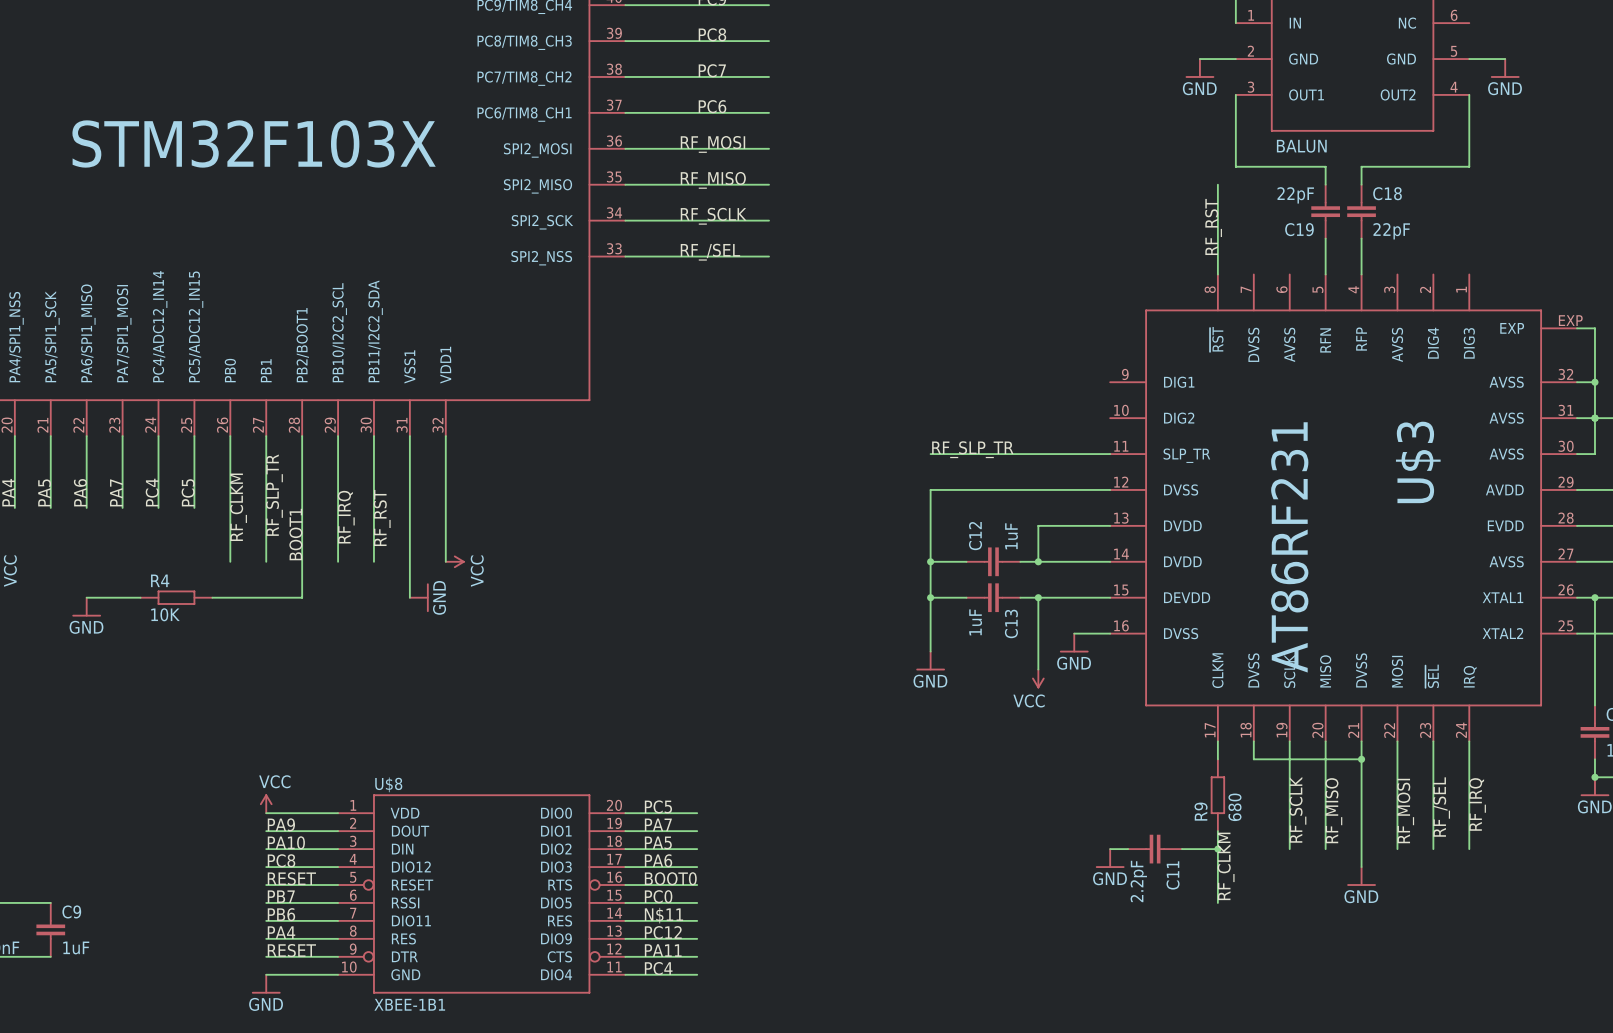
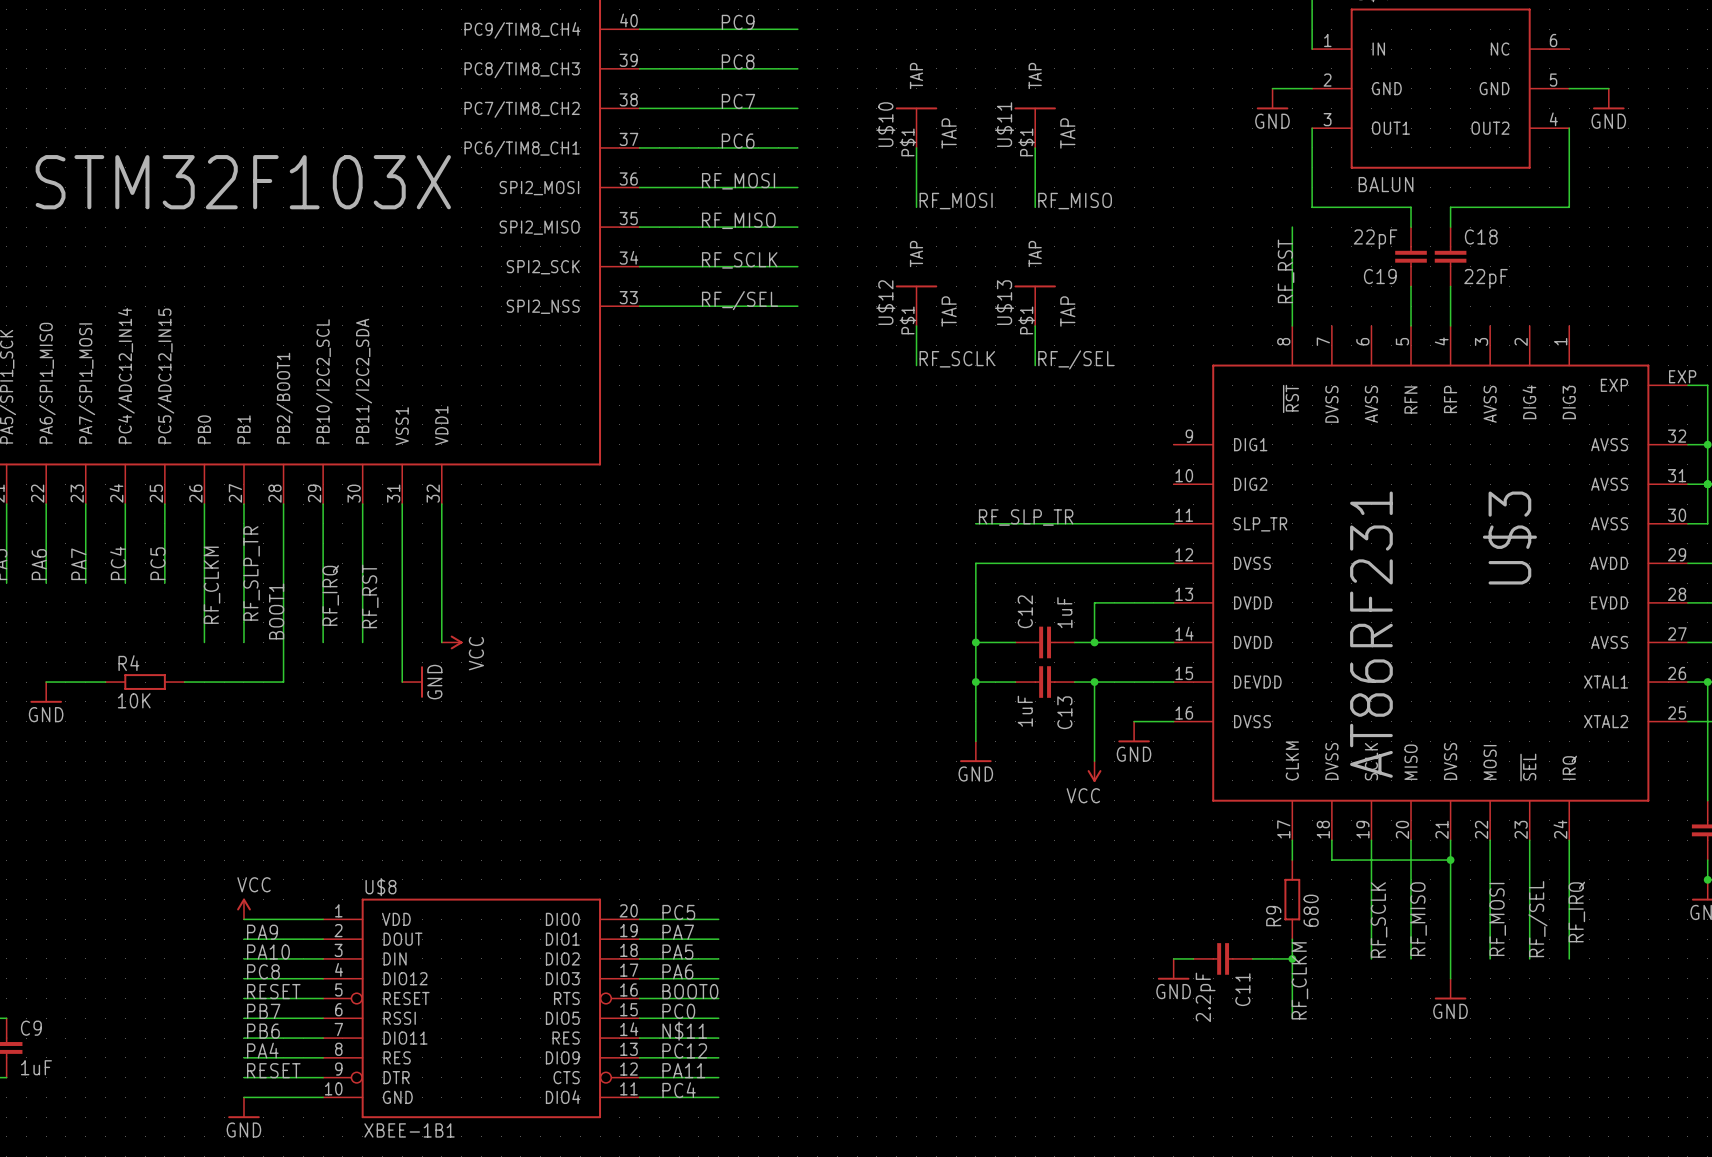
U$10: none -> TAP (916, 127)
U$11: none -> TAP (1035, 127)
wire: none -> (916, 147) (916, 207)
wire: none -> (1035, 147) (1035, 207)
label: none -> RF_MOSI (956, 201)
label: none -> RF_MISO (1075, 201)
U$12: none -> TAP (916, 305)
U$13: none -> TAP (1035, 305)
wire: none -> (916, 325) (916, 365)
wire: none -> (1035, 325) (1035, 365)
label: none -> RF_SCLK (957, 359)
label: none -> RF_/SEL (1076, 359)

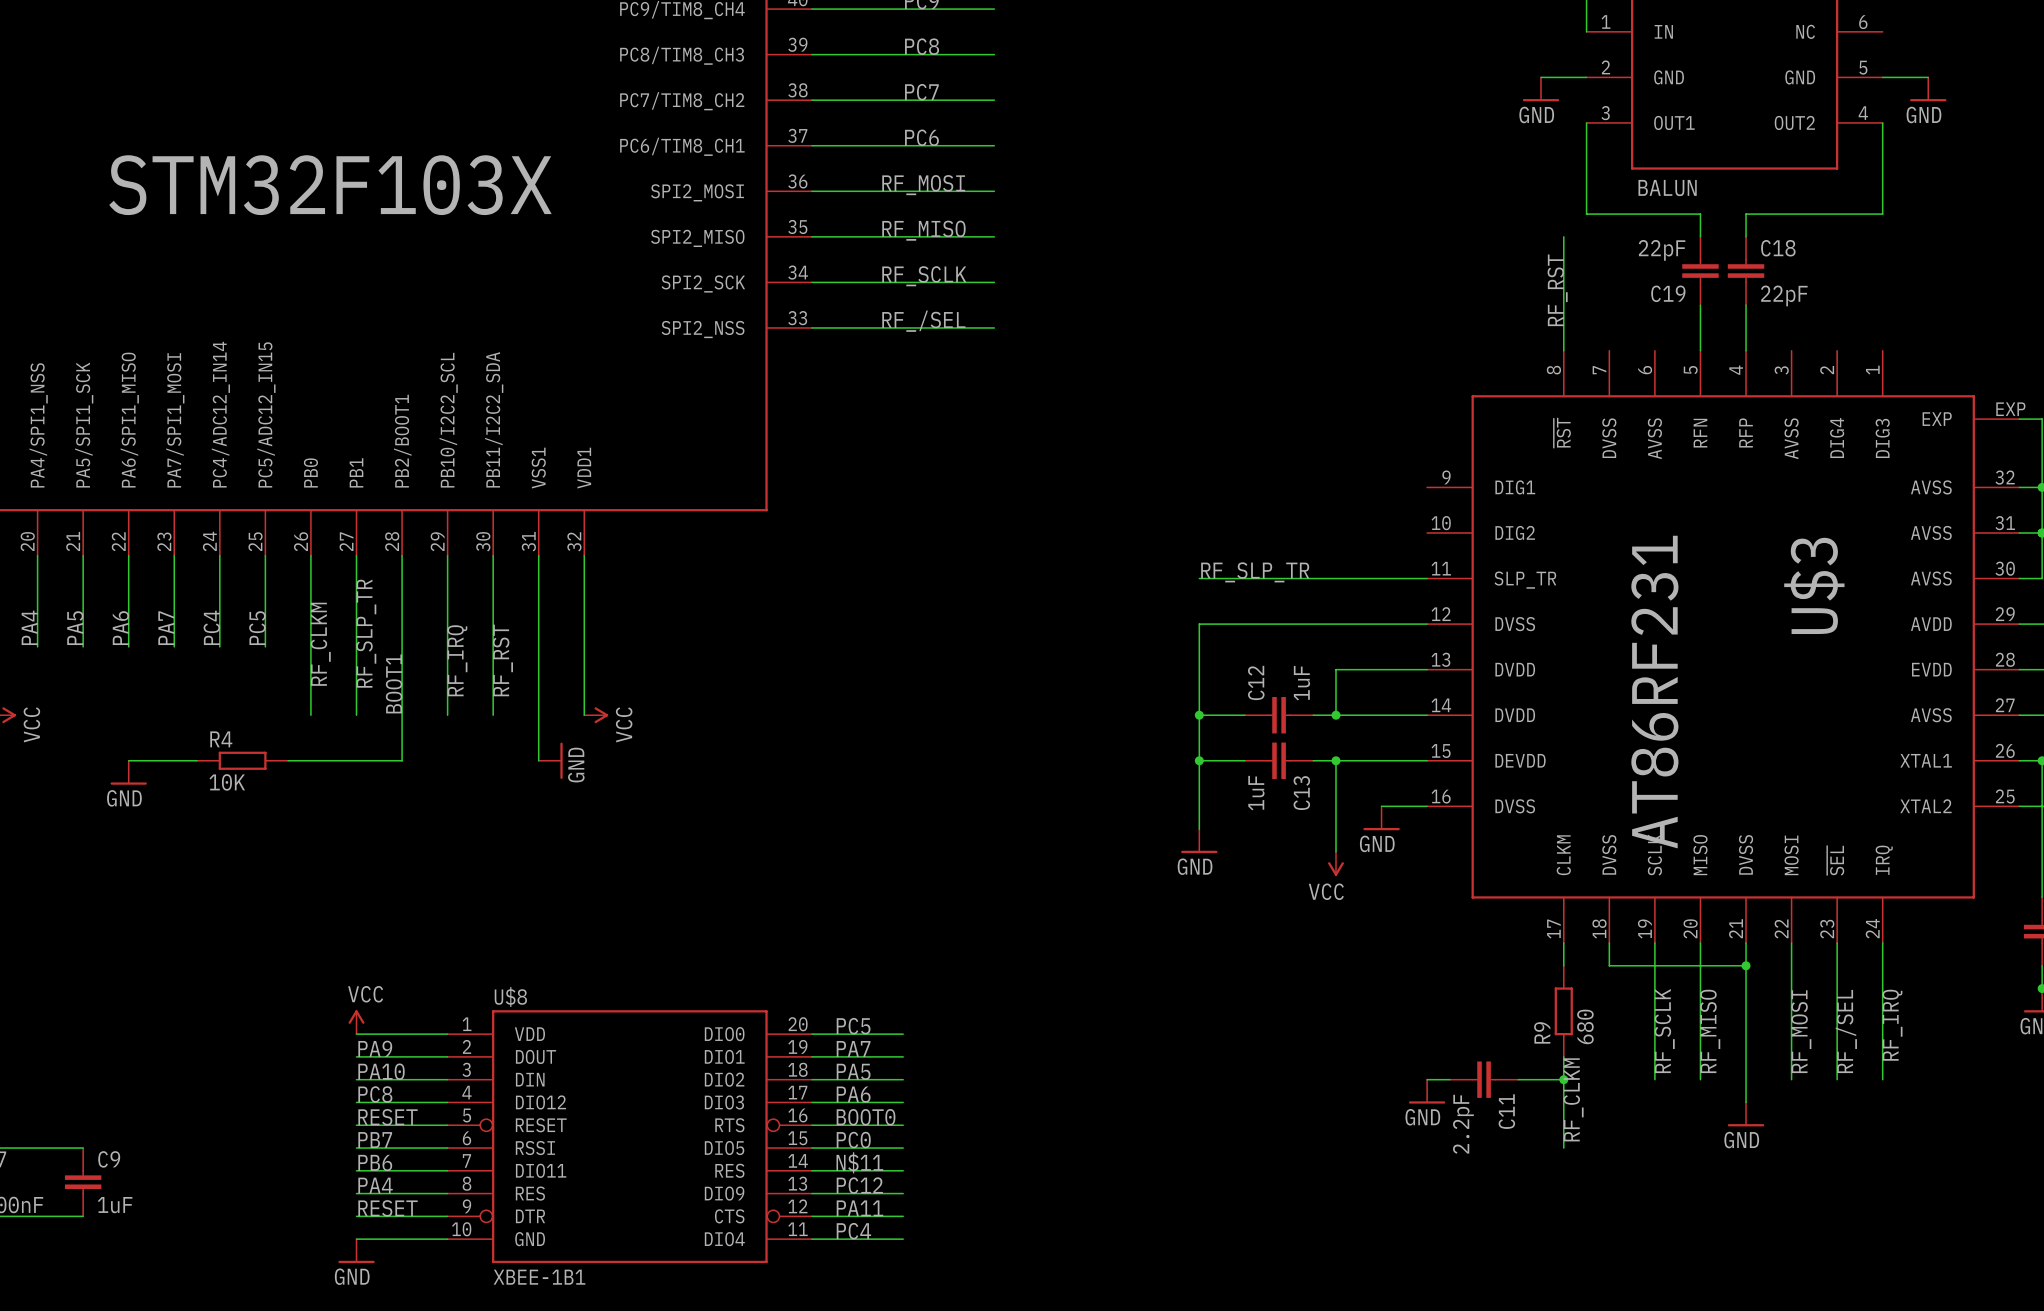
U$10: TAP (916, 127) -> none
U$11: TAP (1035, 127) -> none
wire: (916, 147) (916, 207) -> none
wire: (1035, 147) (1035, 207) -> none
label: RF_MOSI (956, 201) -> none
label: RF_MISO (1075, 201) -> none
U$12: TAP (916, 305) -> none
U$13: TAP (1035, 305) -> none
wire: (916, 325) (916, 365) -> none
wire: (1035, 325) (1035, 365) -> none
label: RF_SCLK (957, 359) -> none
label: RF_/SEL (1076, 359) -> none

